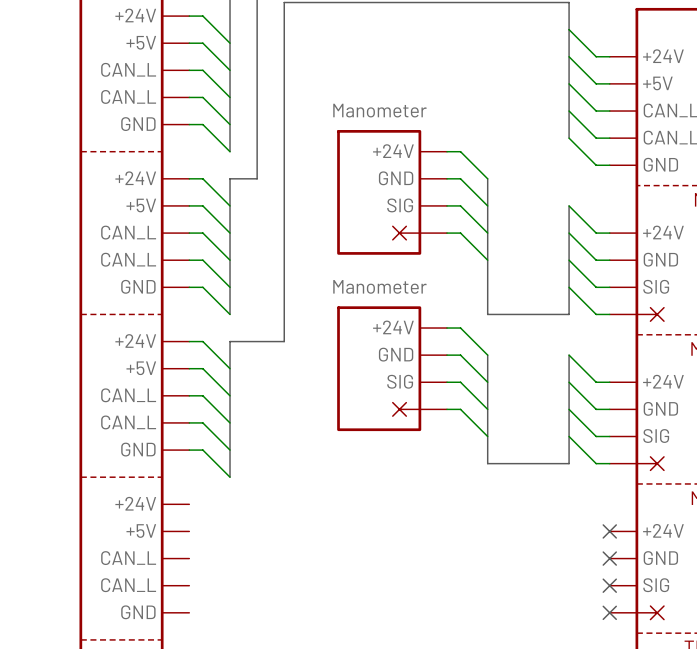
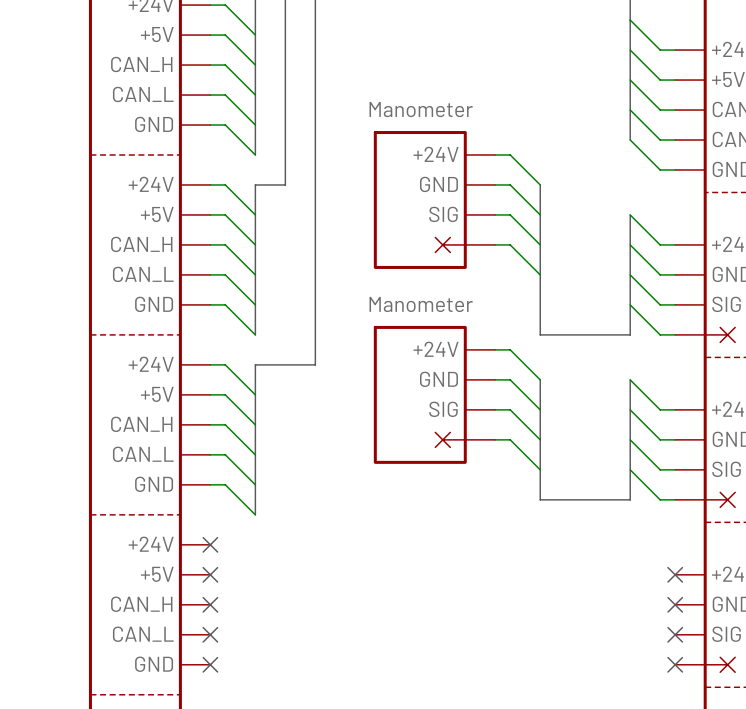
part pin name: CAN_L (128, 69) -> CAN_H (141, 64)
part pin name: CAN_L (128, 232) -> CAN_H (141, 244)
part pin name: CAN_L (128, 395) -> CAN_H (141, 424)
no-connect mark: none -> (210, 544)
no-connect mark: none -> (210, 574)
part pin name: CAN_L (128, 558) -> CAN_H (141, 604)
no-connect mark: none -> (210, 604)
no-connect mark: none -> (210, 634)
no-connect mark: none -> (210, 664)

